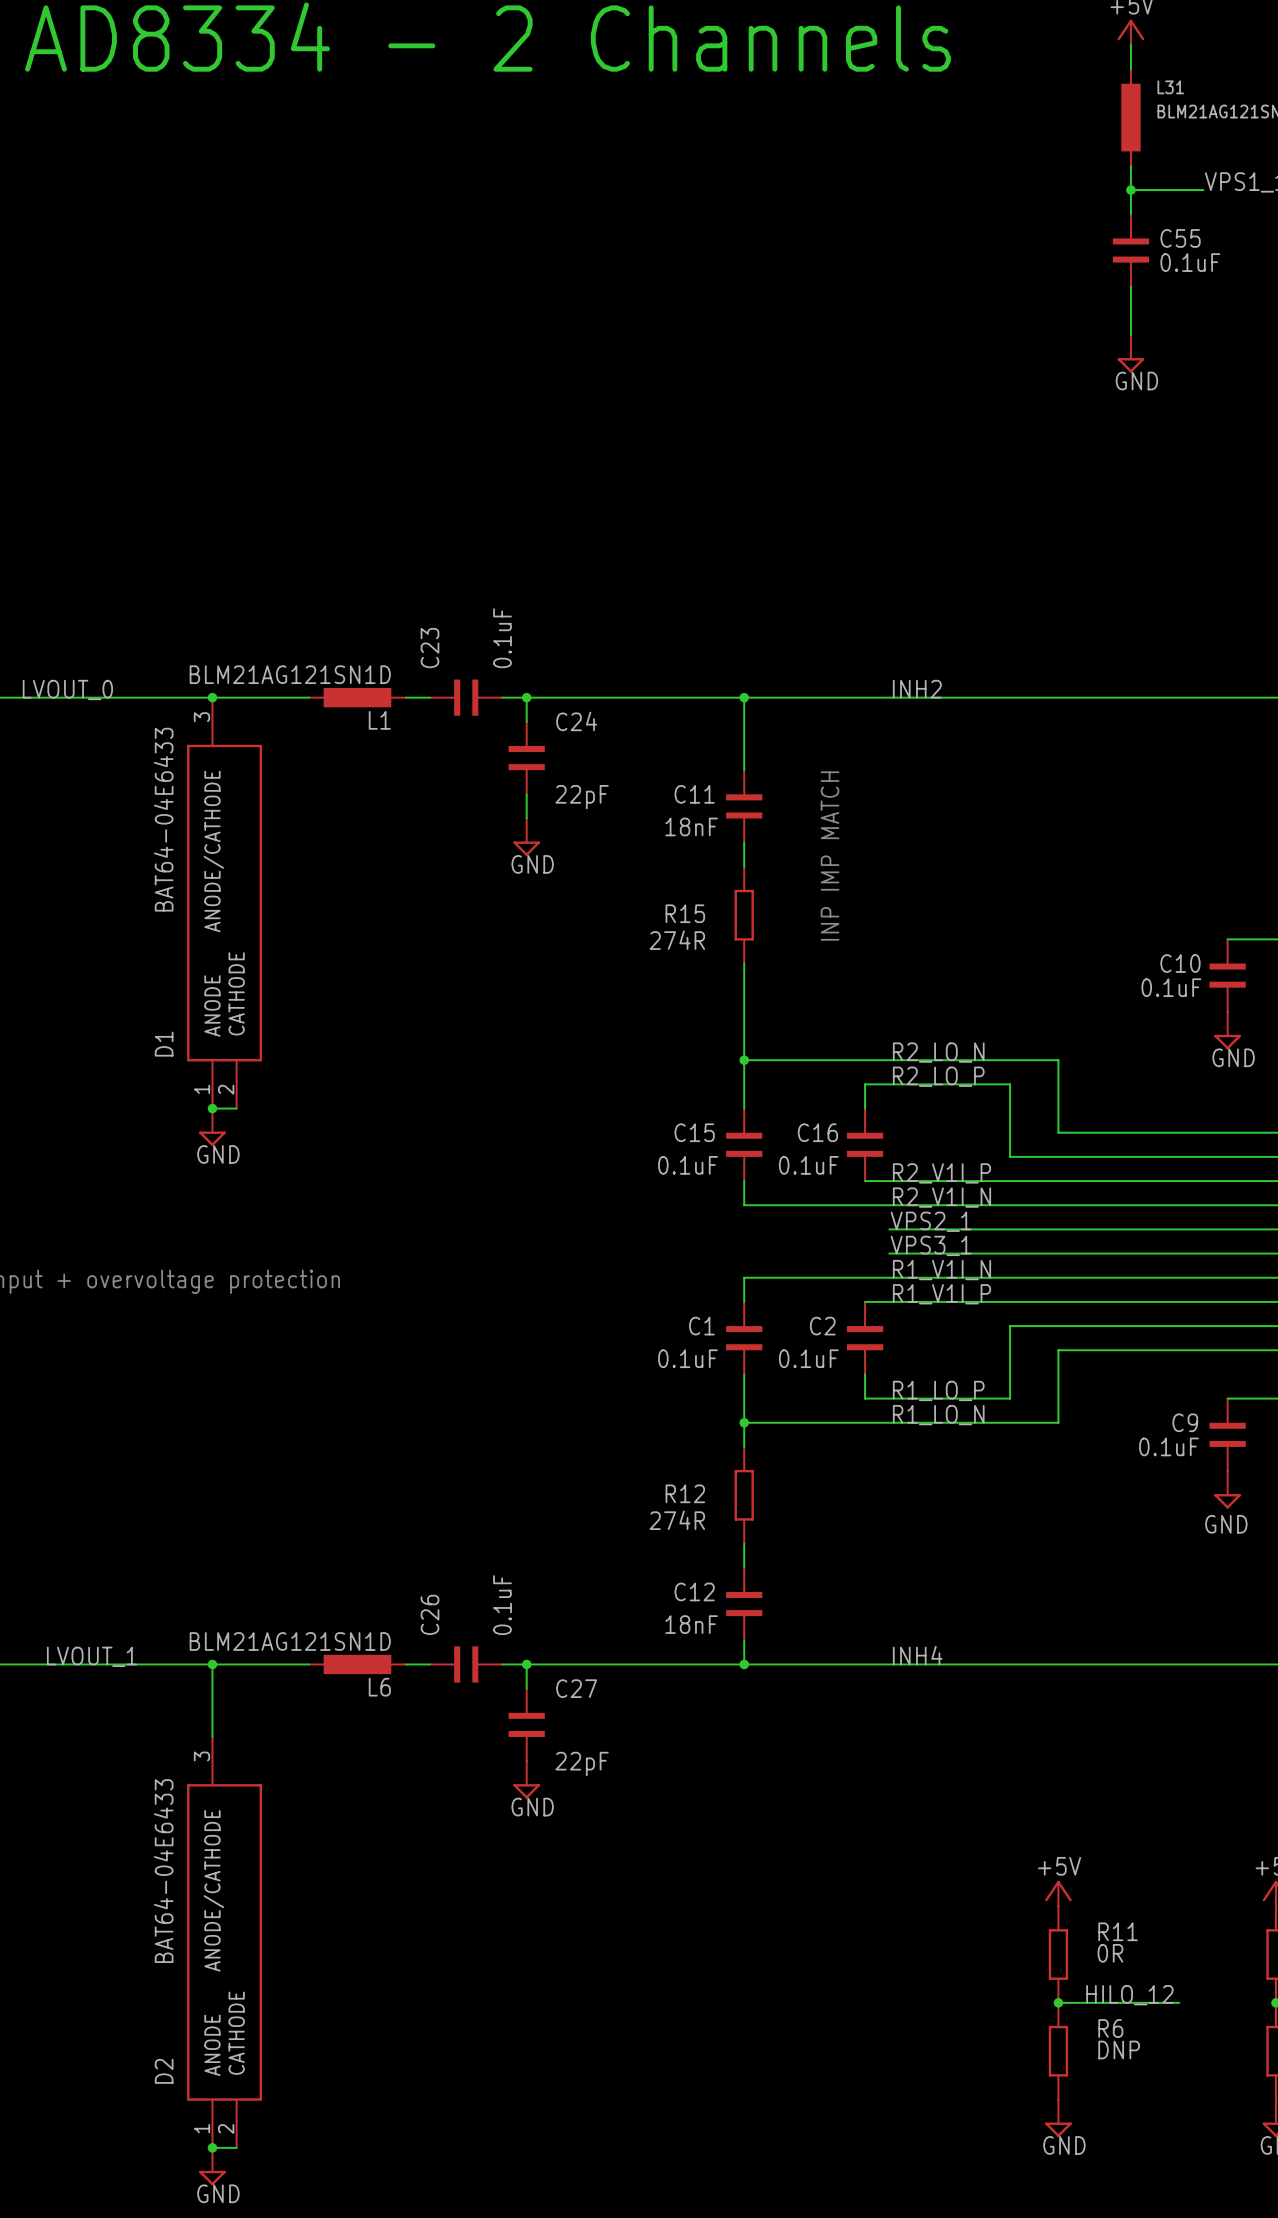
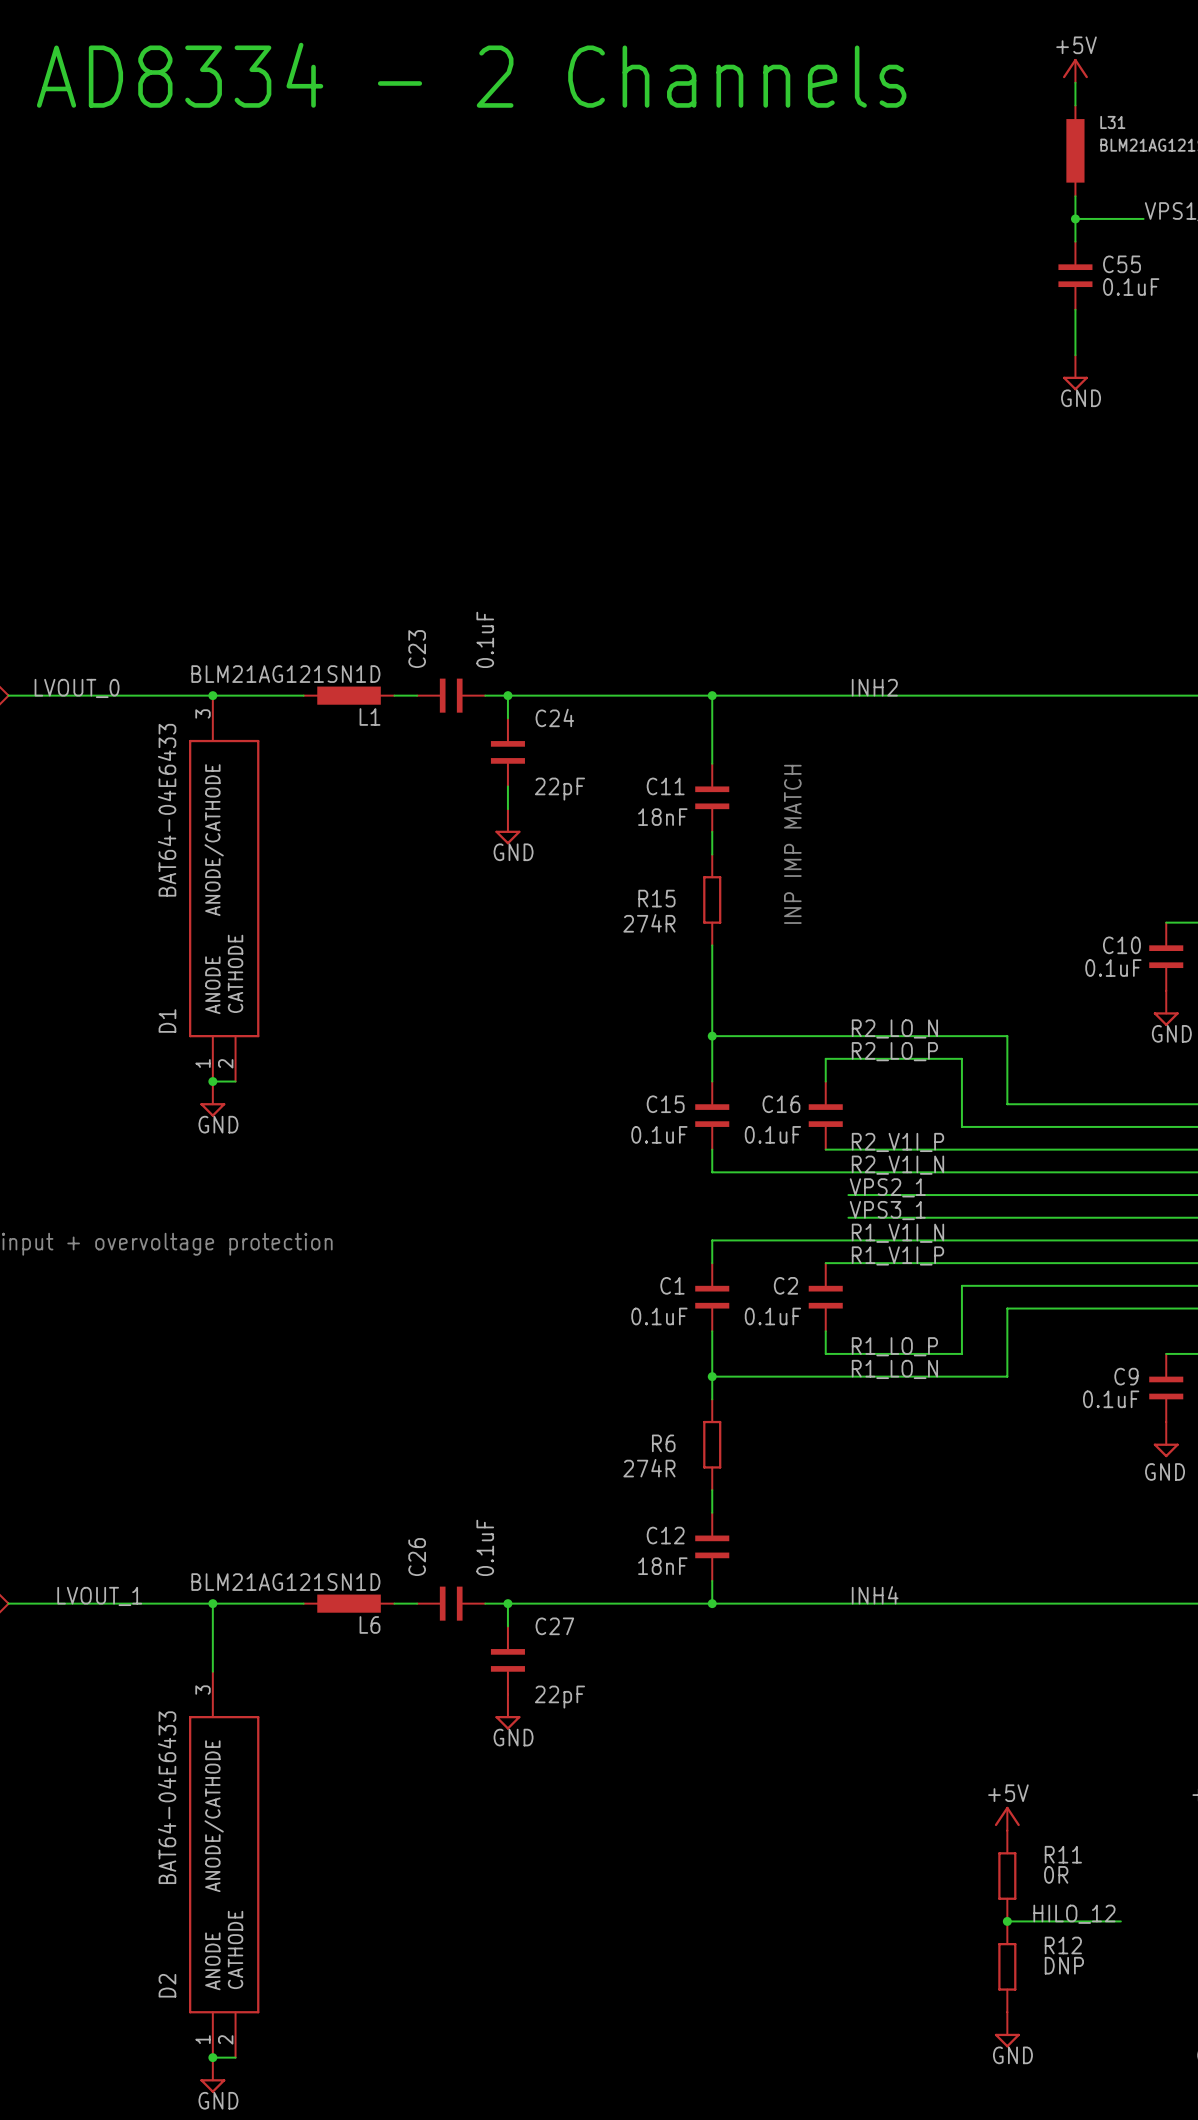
R12 name: R12 (685, 1493) -> R6 (663, 1443)
R6 name: R6 (1110, 2028) -> R12 (1063, 1945)

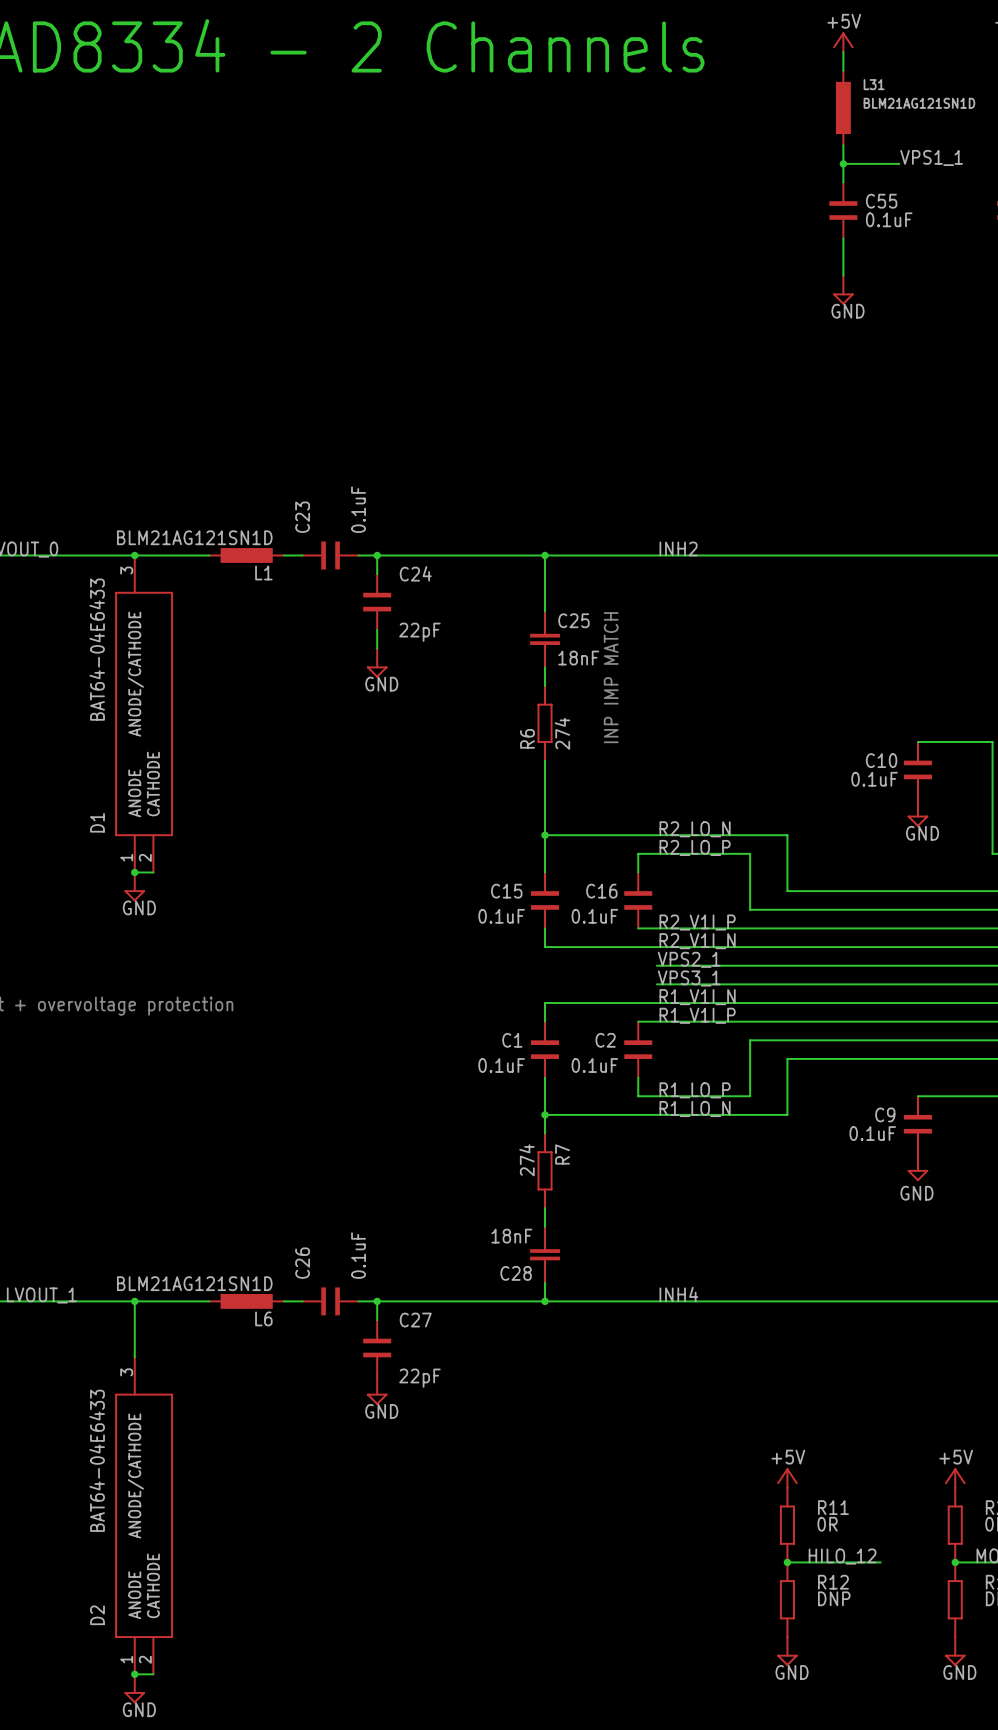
C11: 18nF (712, 797) -> none
C25: none -> 18nF (545, 639)
R15 name: R15 (656, 898) -> R6 (527, 738)
R15 value: 274R (649, 923) -> 274 (562, 733)
R6 name: R6 (663, 1443) -> R7 (562, 1154)
R6 value: 274R (649, 1468) -> 274 (526, 1160)
C12: 18nF (712, 1546) -> none
C28: none -> 18nF (545, 1254)

